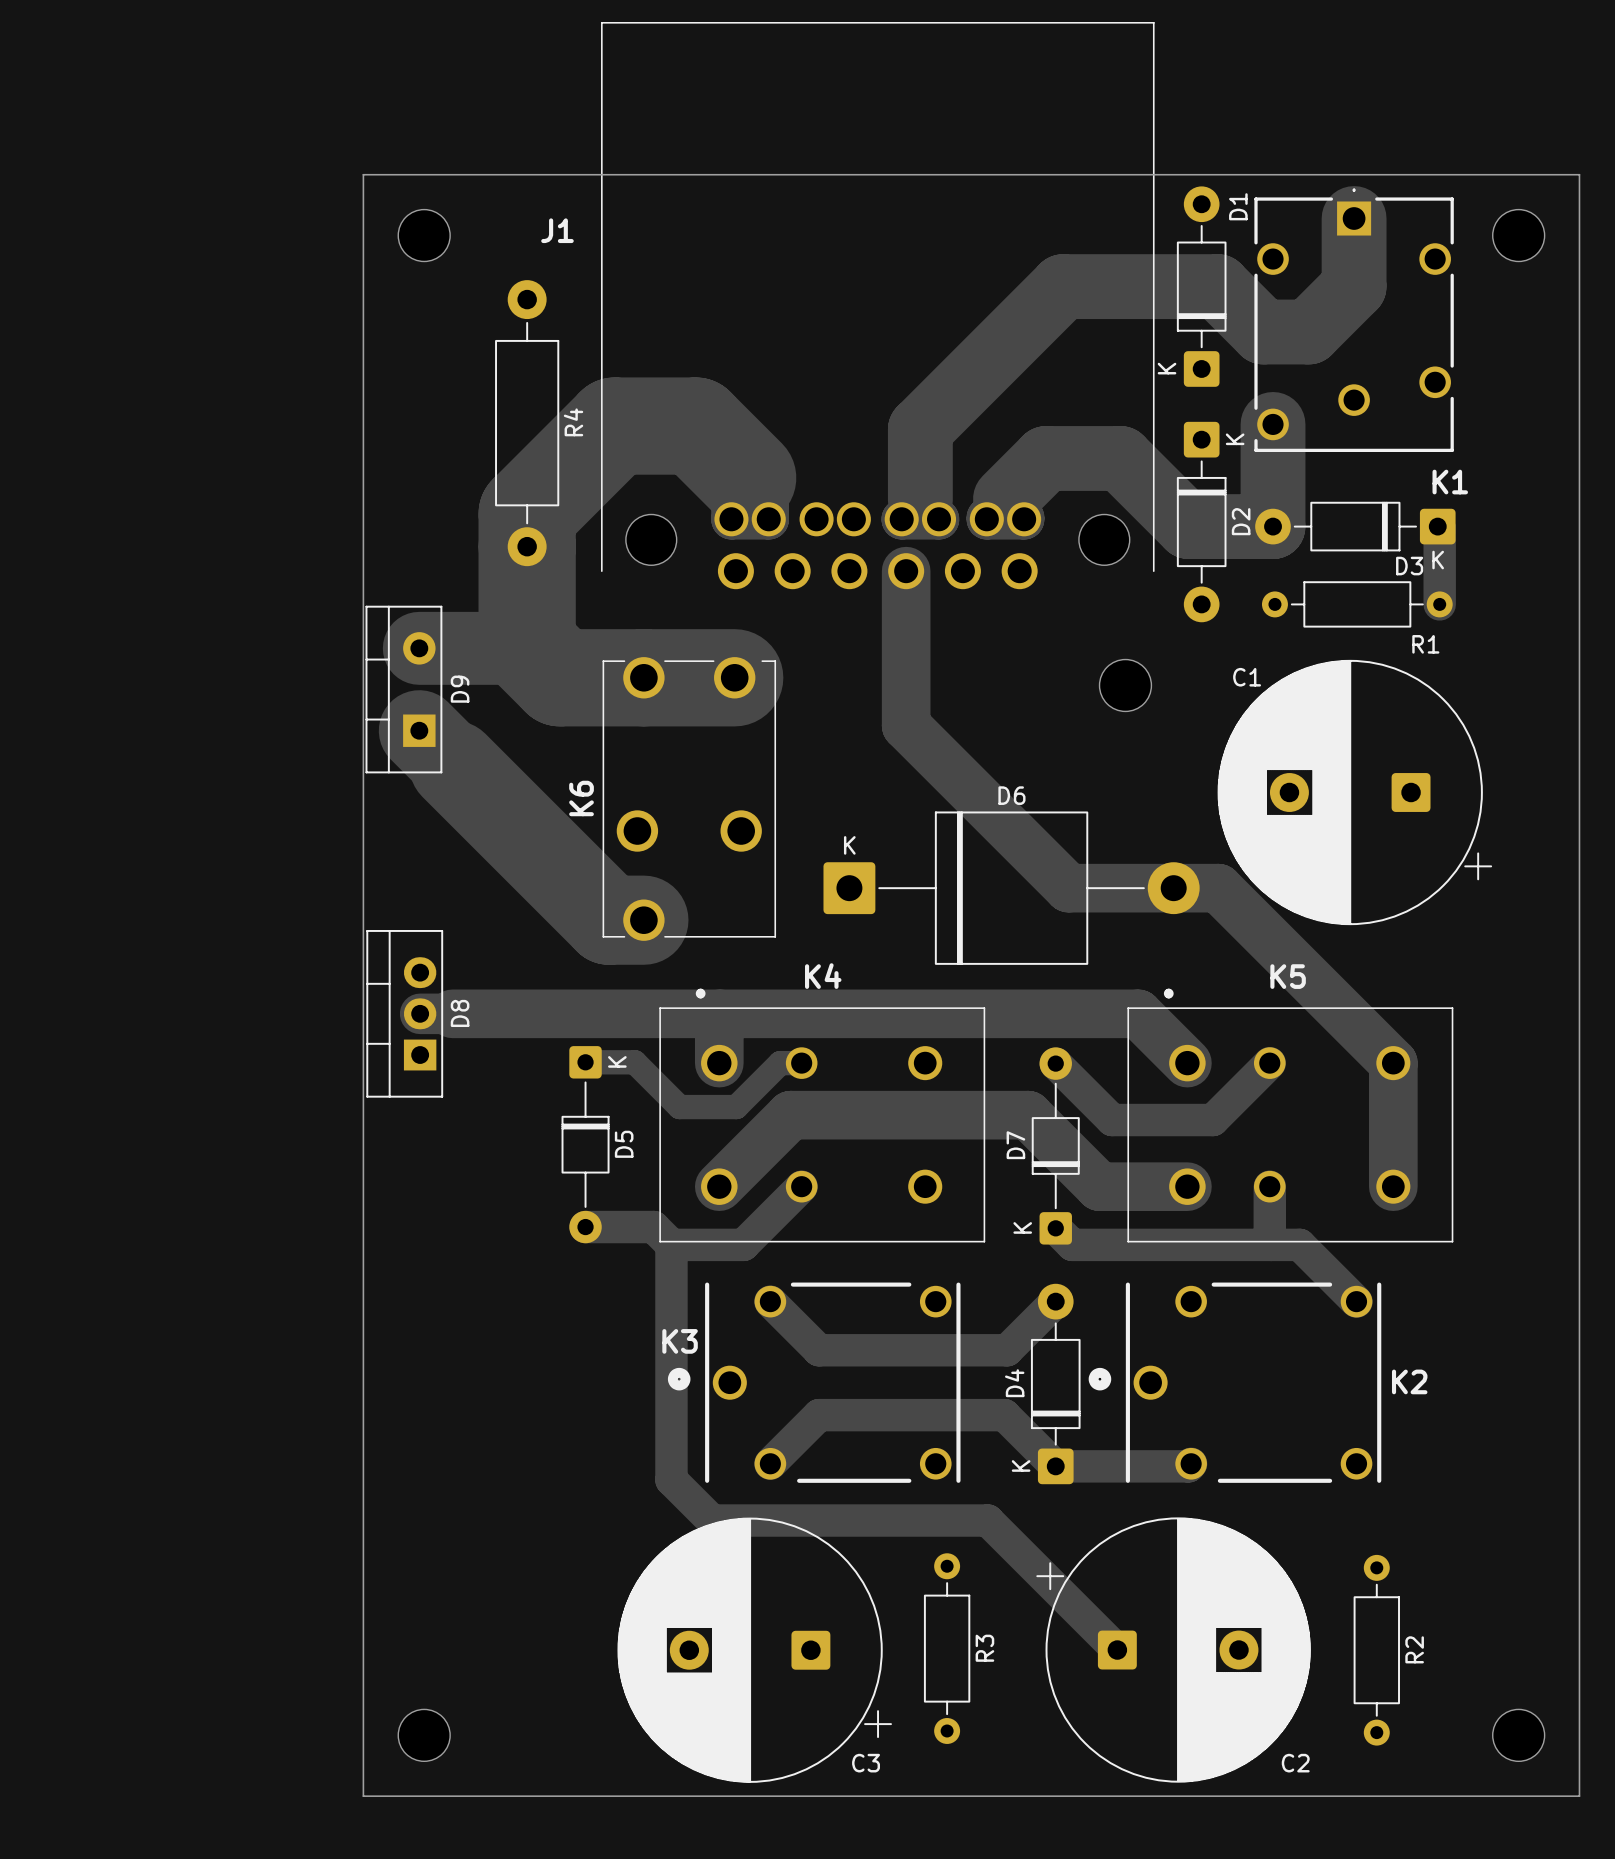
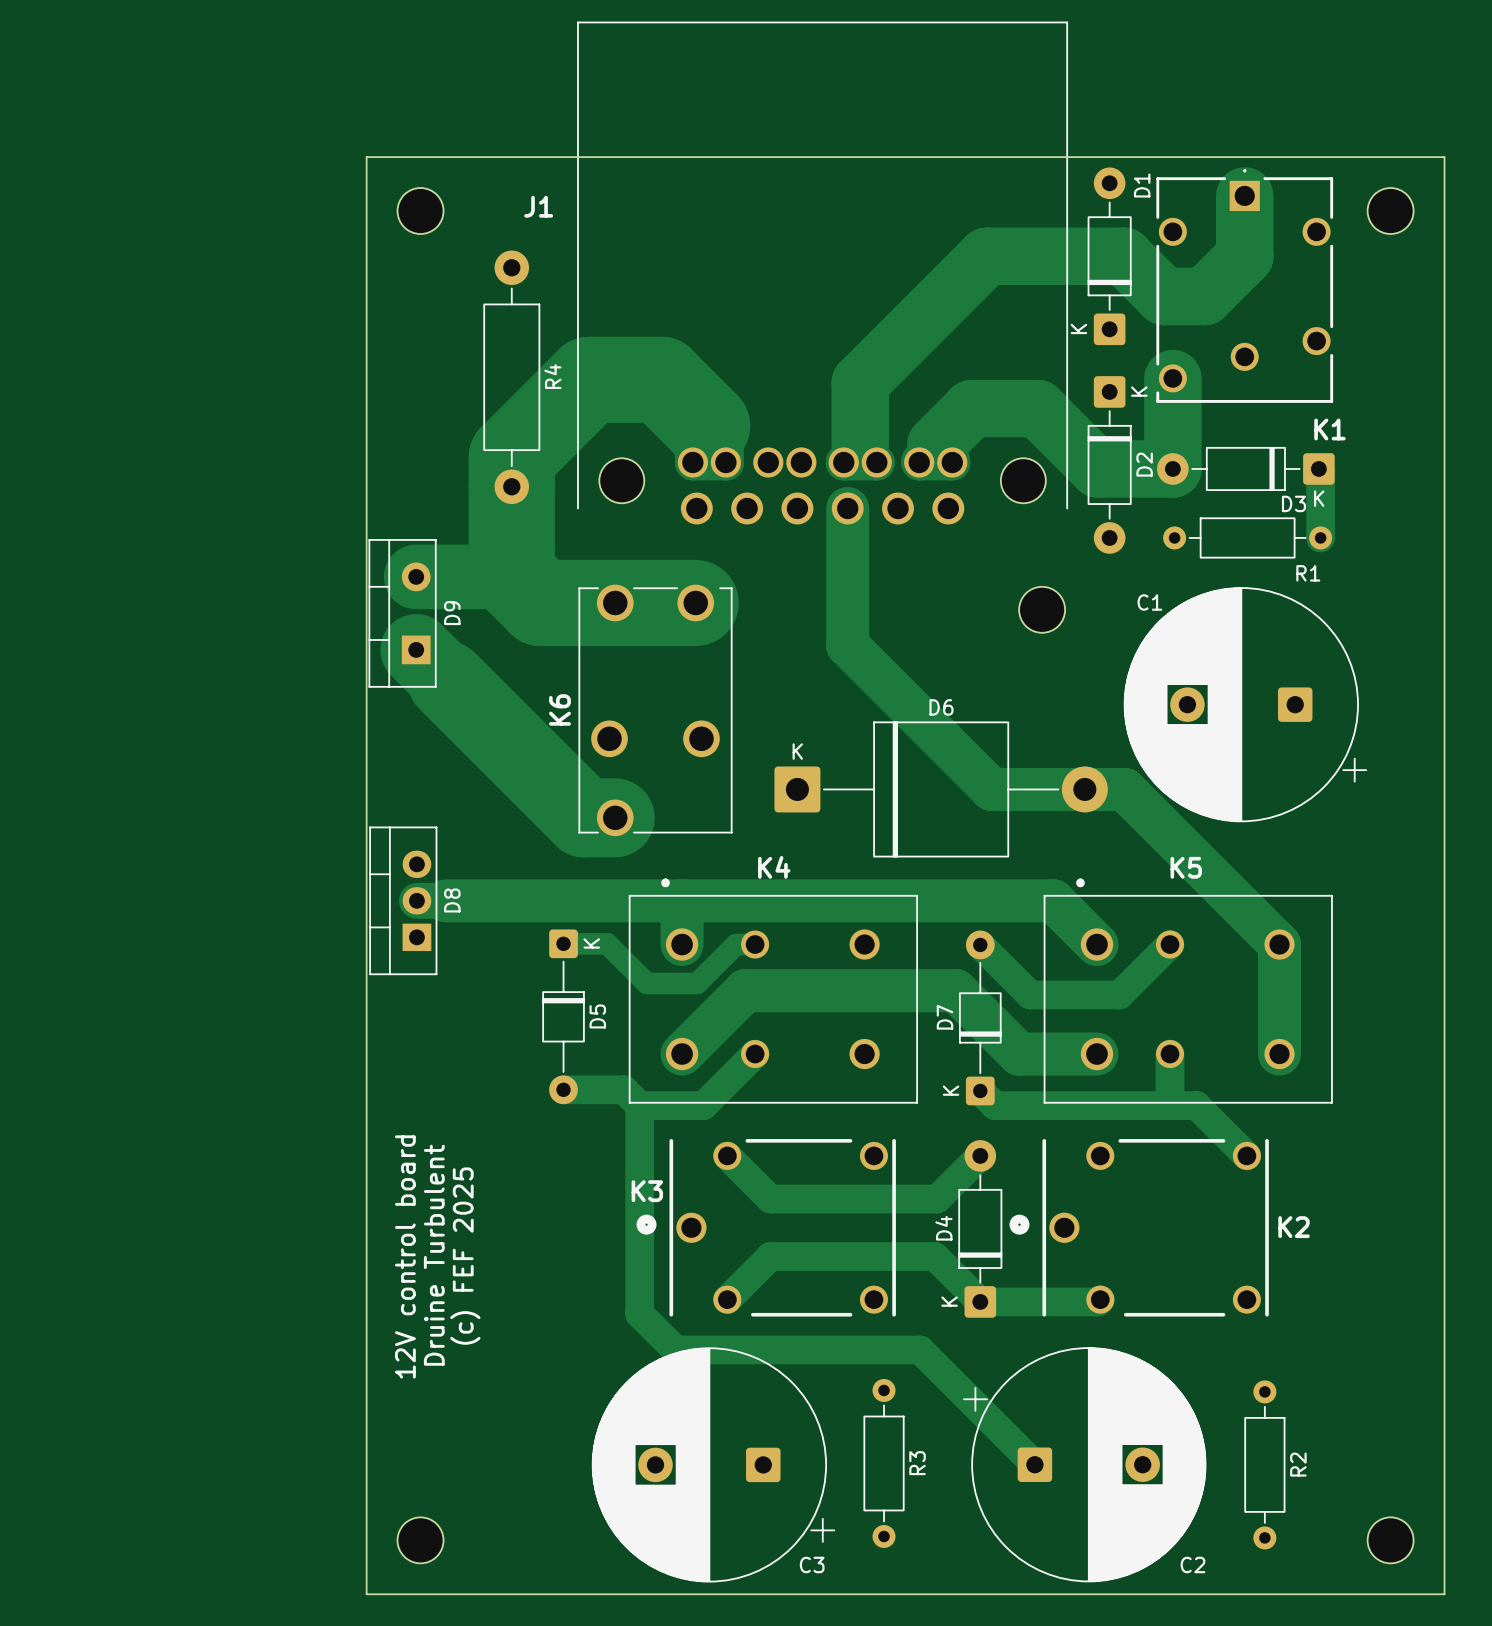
text: none -> Druine Turbulent (434, 1255)
text: none -> (c) FEF 2025 (465, 1256)
text: none -> 12V control board (405, 1256)

